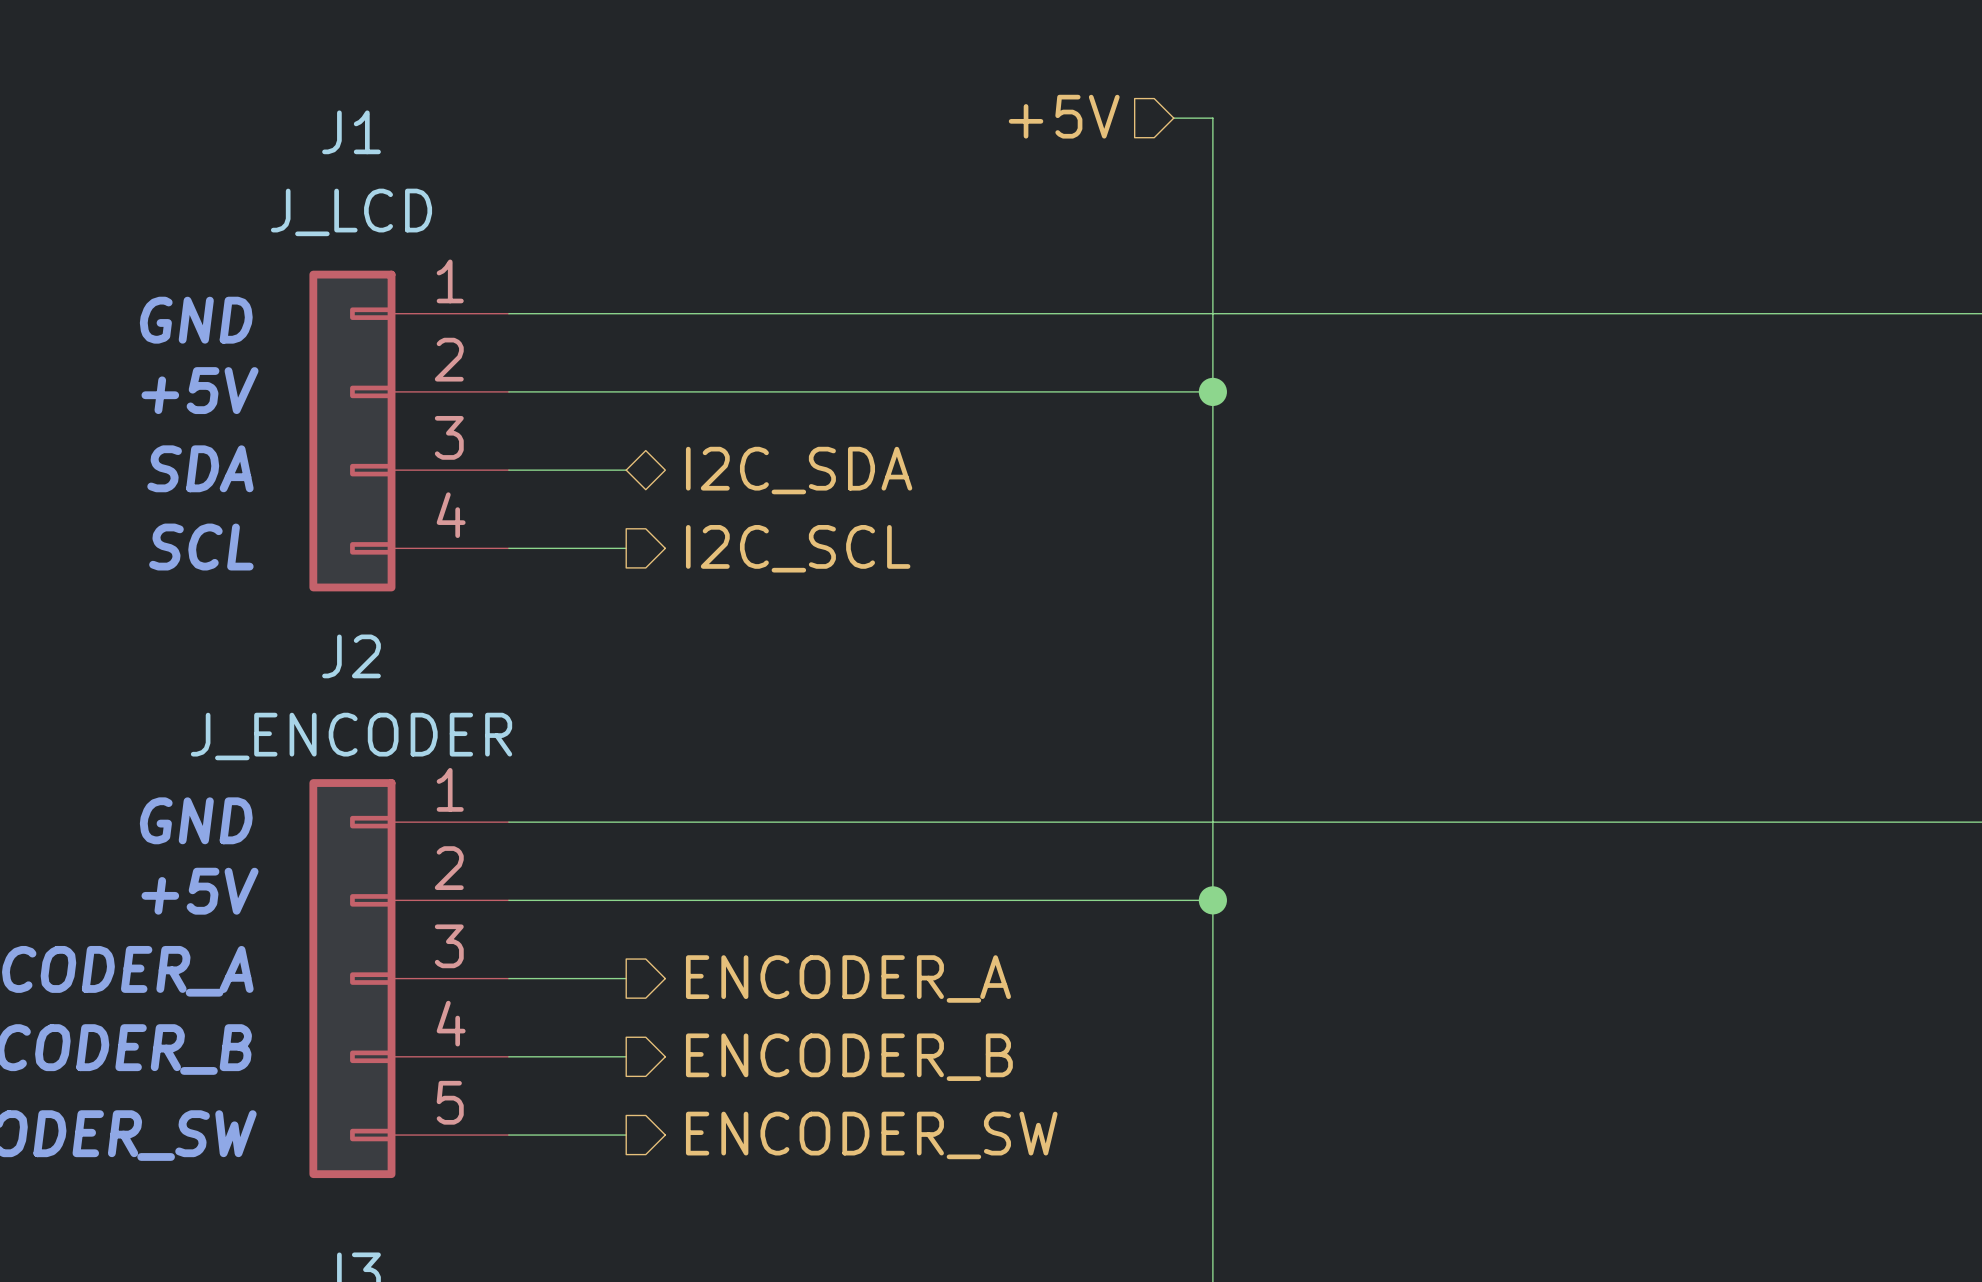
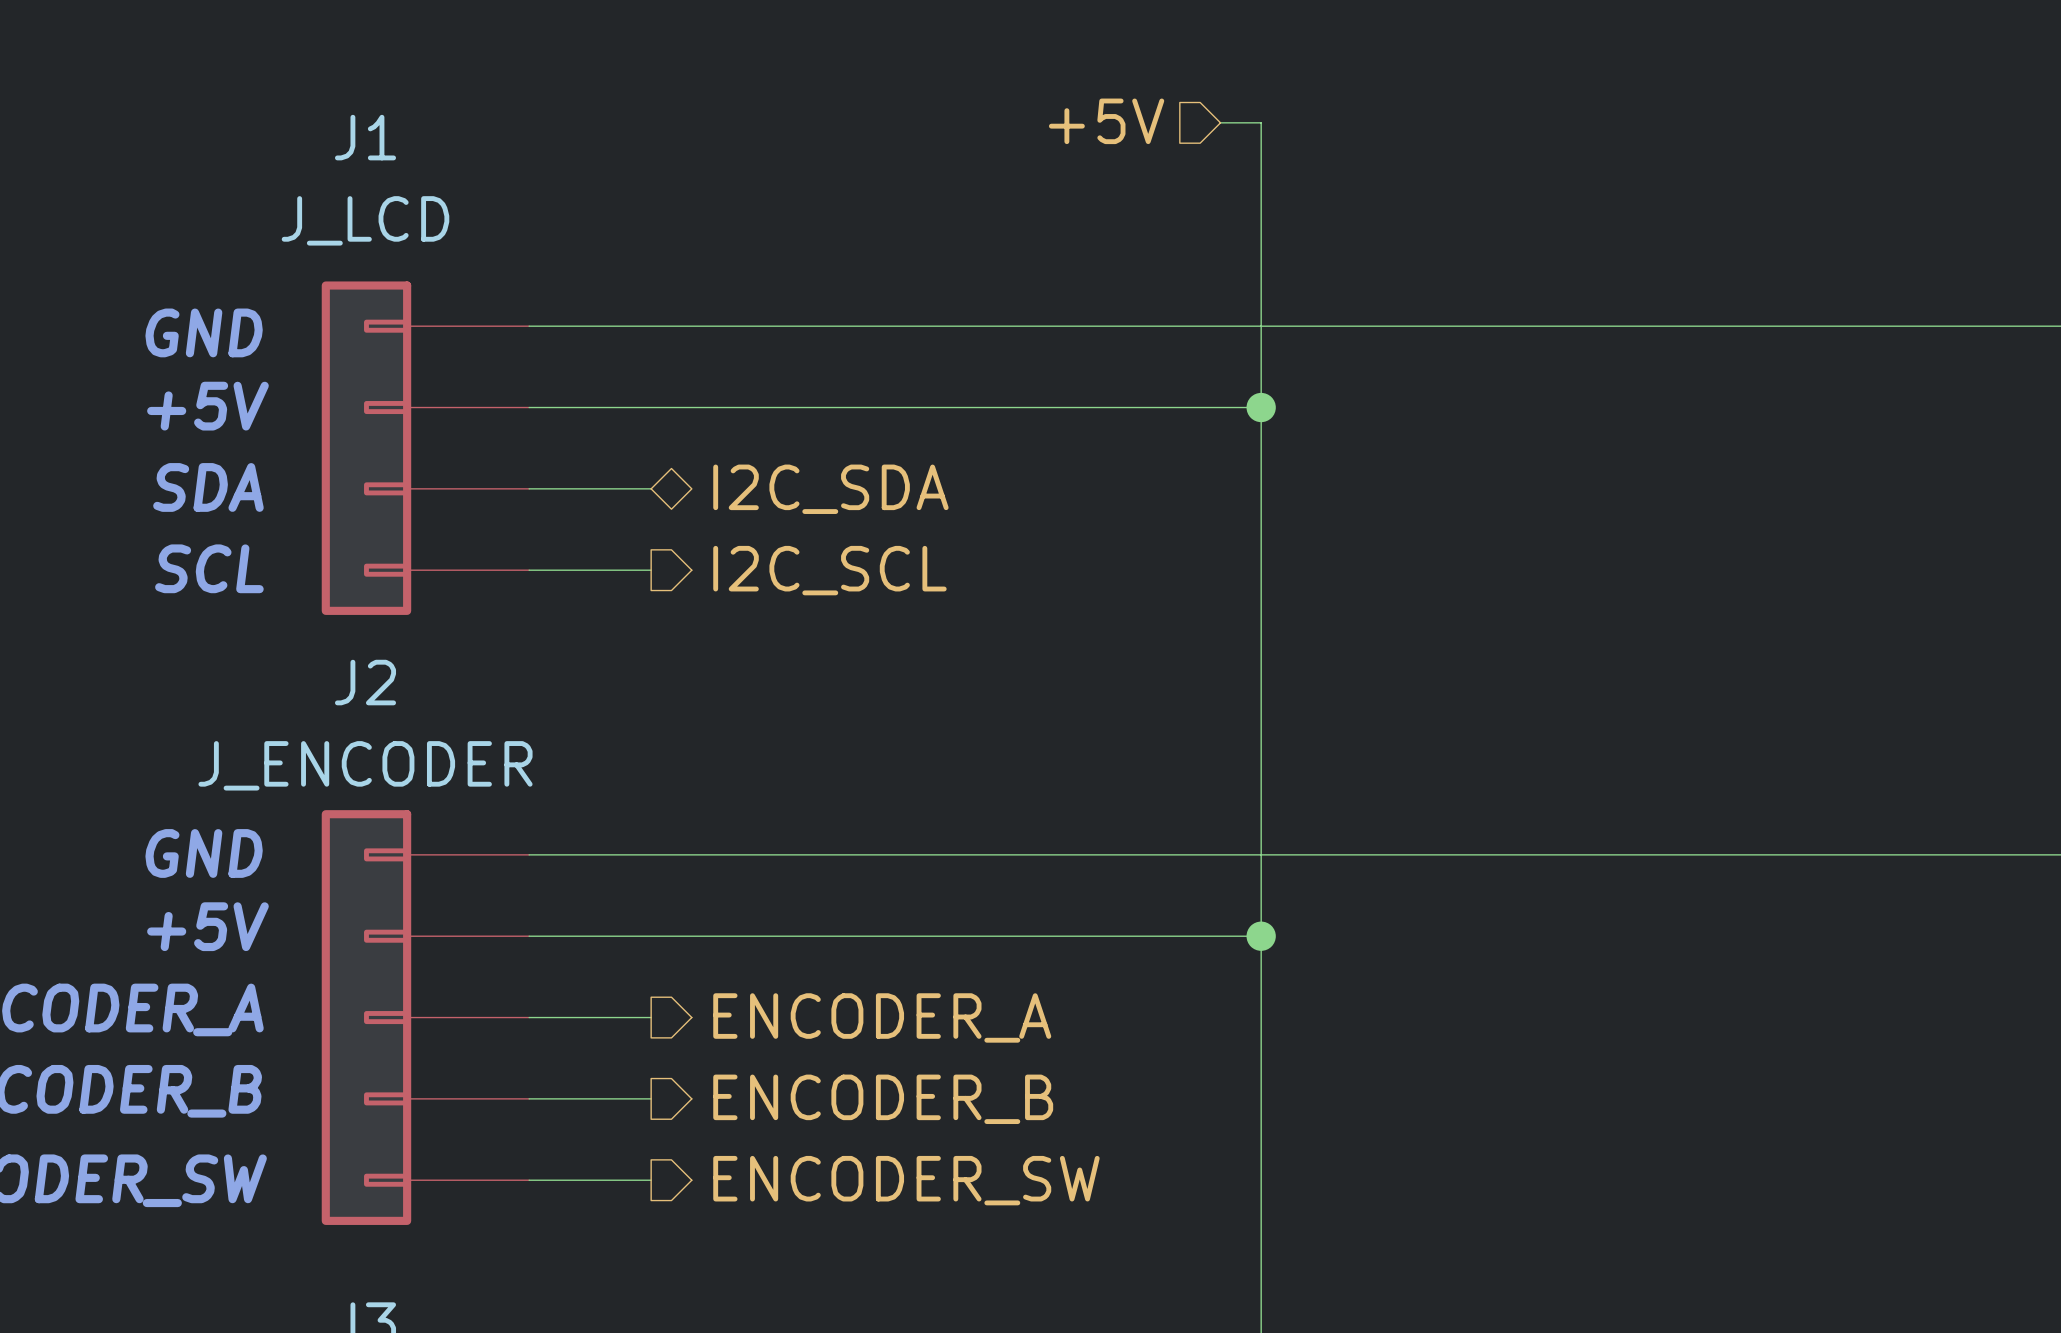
J1 pin number: 1 (450, 281) -> none
J1 pin number: 2 (449, 359) -> none
J1 pin number: 3 (449, 437) -> none
J1 pin number: 4 (451, 515) -> none
J2 pin number: 1 (450, 789) -> none
J2 pin number: 2 (449, 868) -> none
J2 pin number: 3 (449, 946) -> none
J2 pin number: 4 (451, 1023) -> none
J2 pin number: 5 (450, 1102) -> none

